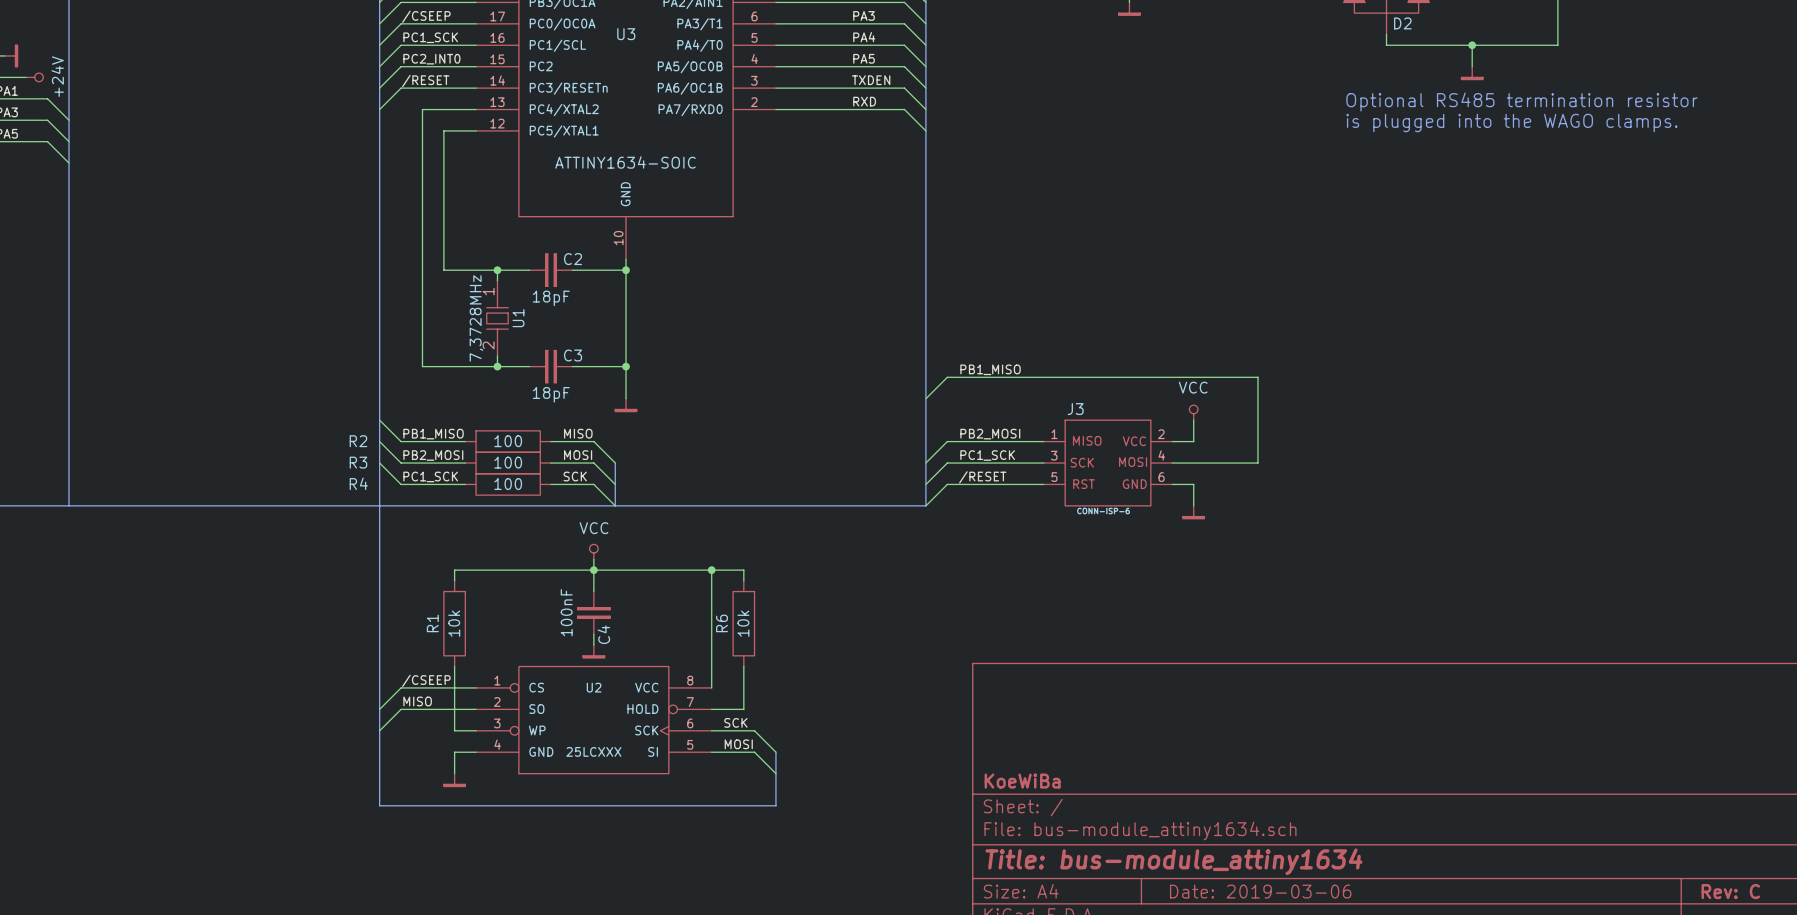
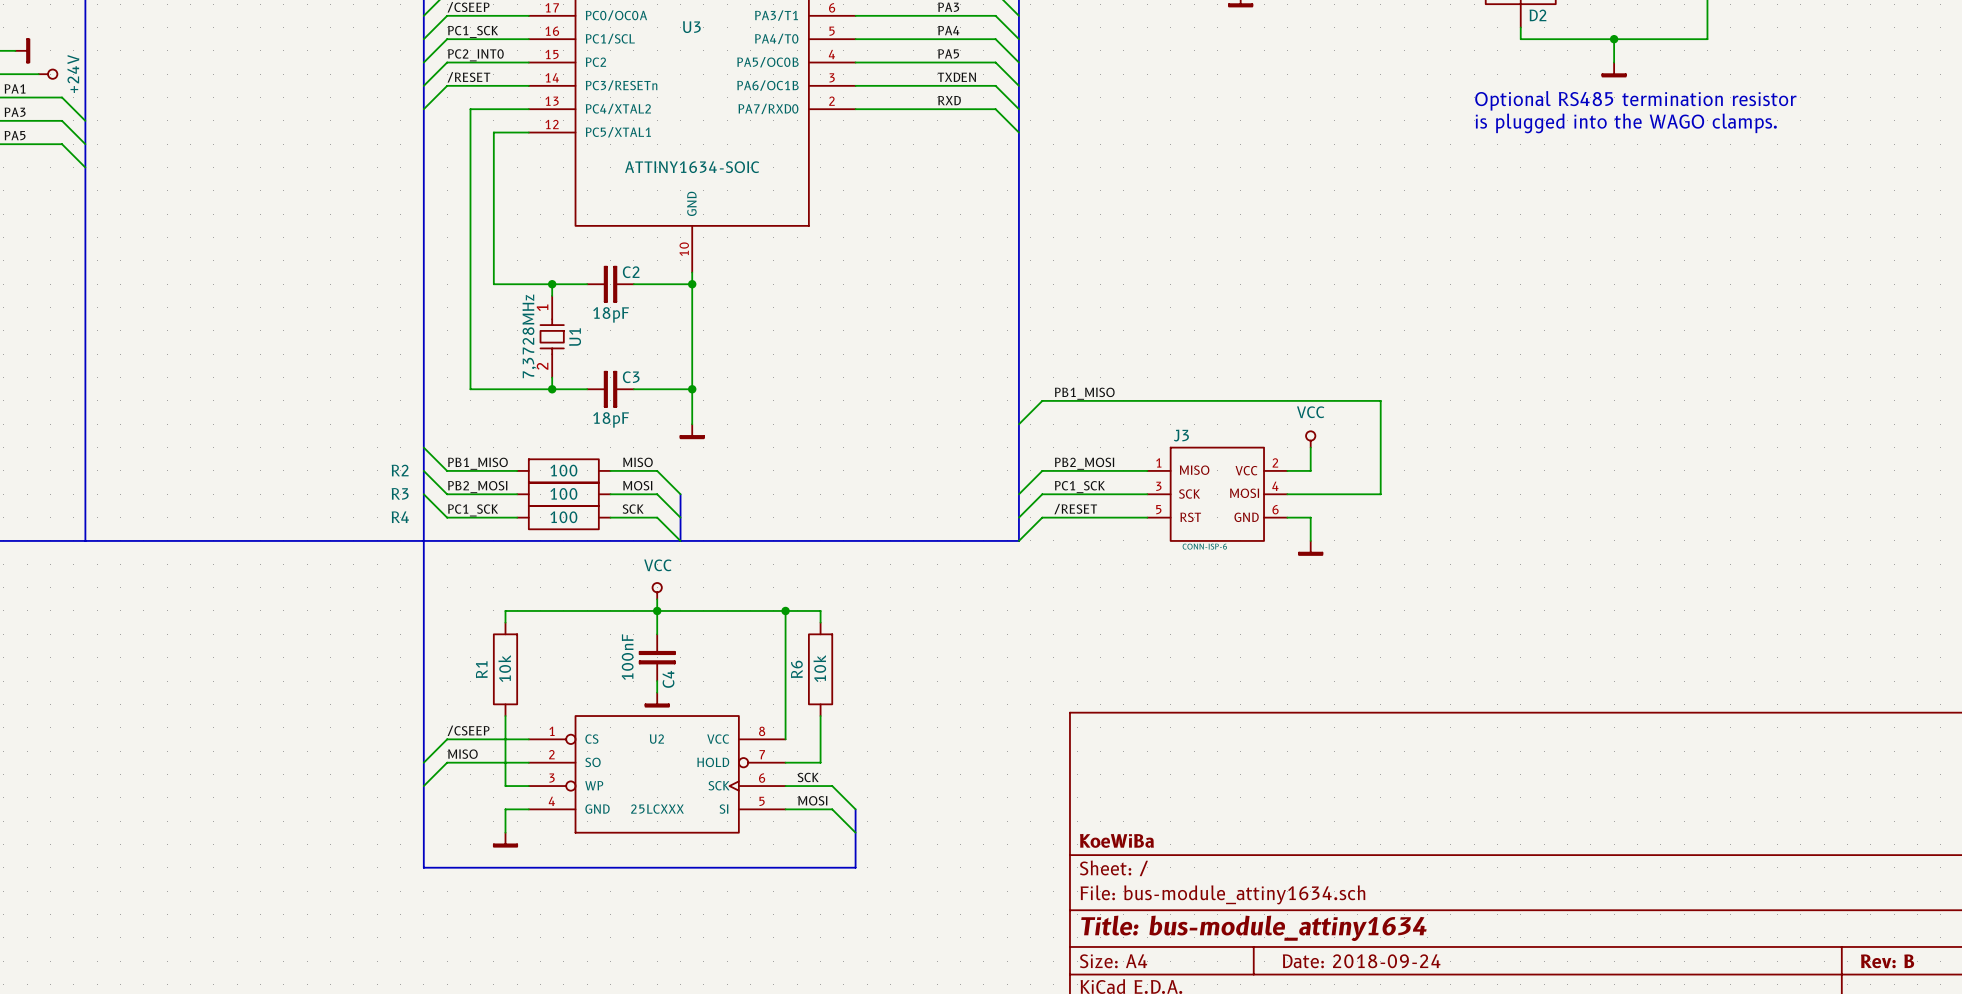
title block: Date: 2019-03-06 (1260, 891) -> Date: 2018-09-24 (1361, 961)
title block: Rev: C (1730, 891) -> Rev: B (1887, 961)

